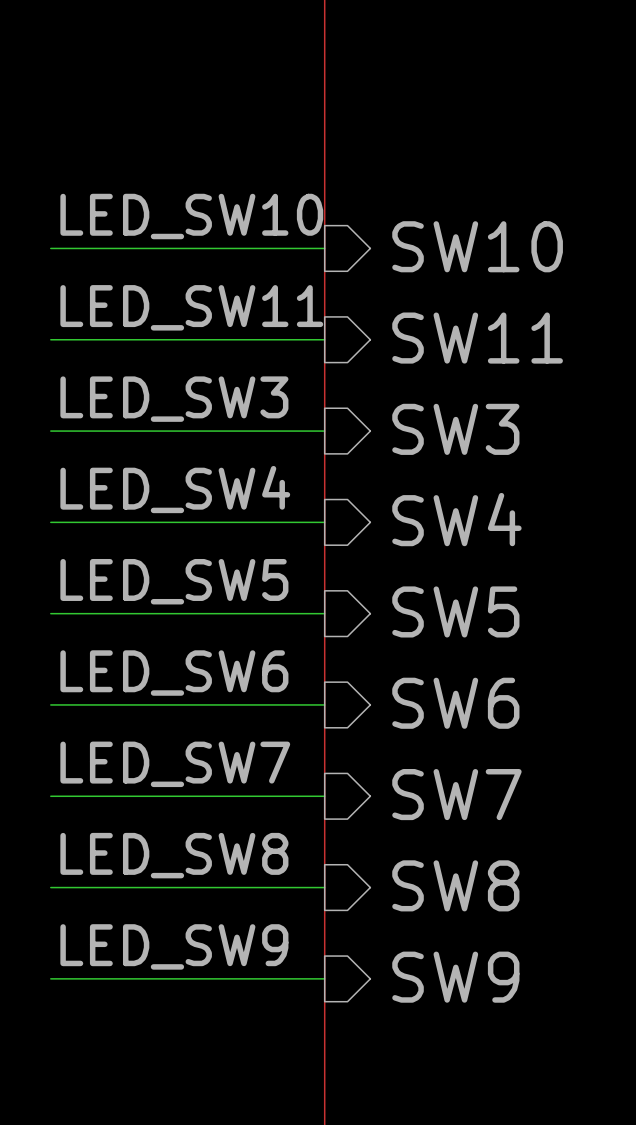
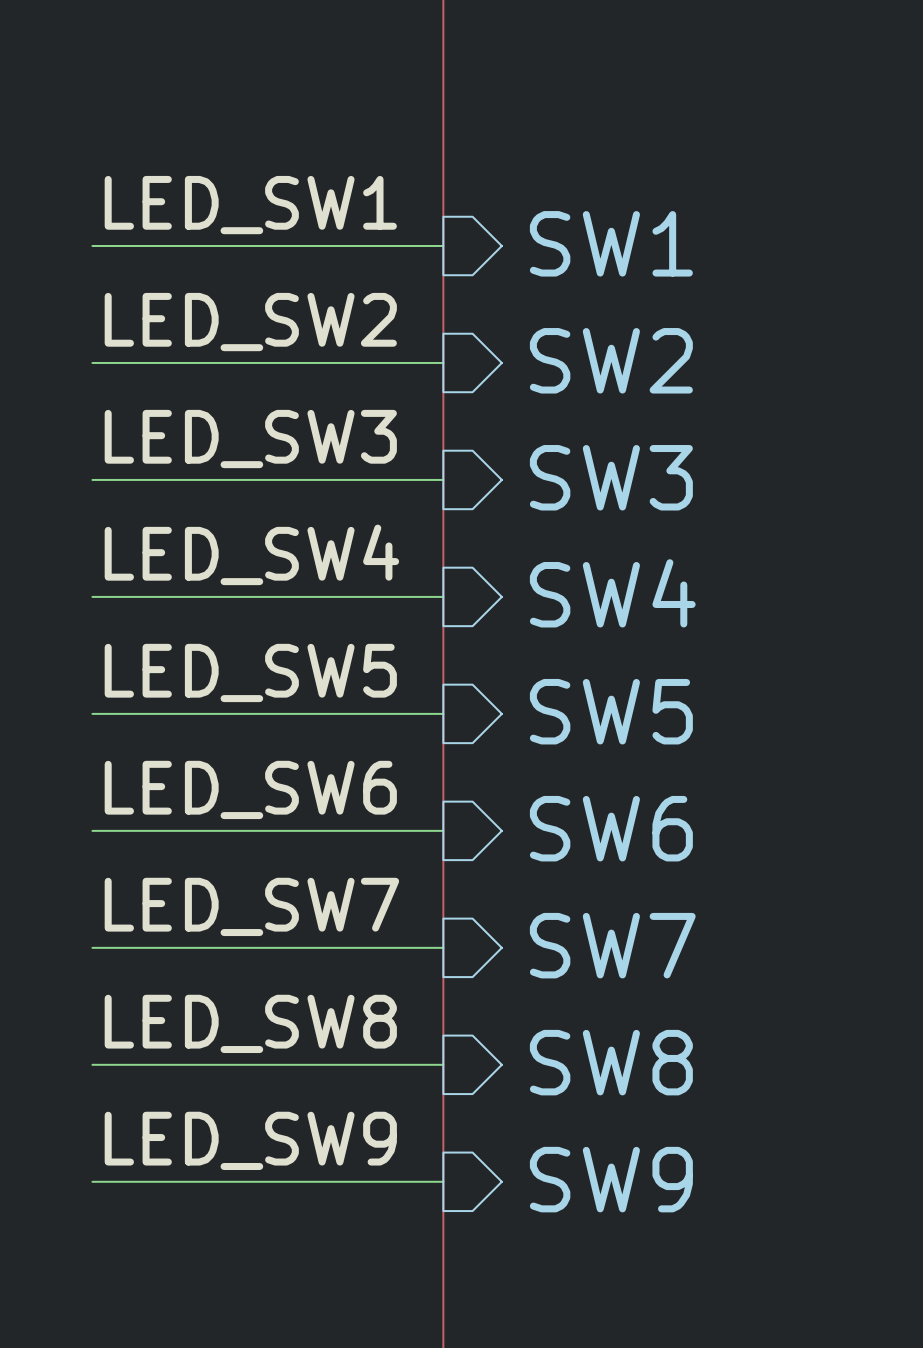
label: LED_SW10 (191, 216) -> LED_SW1 (250, 205)
sheet pin: SW10 (477, 246) -> SW1 (611, 243)
label: LED_SW11 (191, 307) -> LED_SW2 (250, 322)
sheet pin: SW11 (477, 338) -> SW2 (611, 360)

